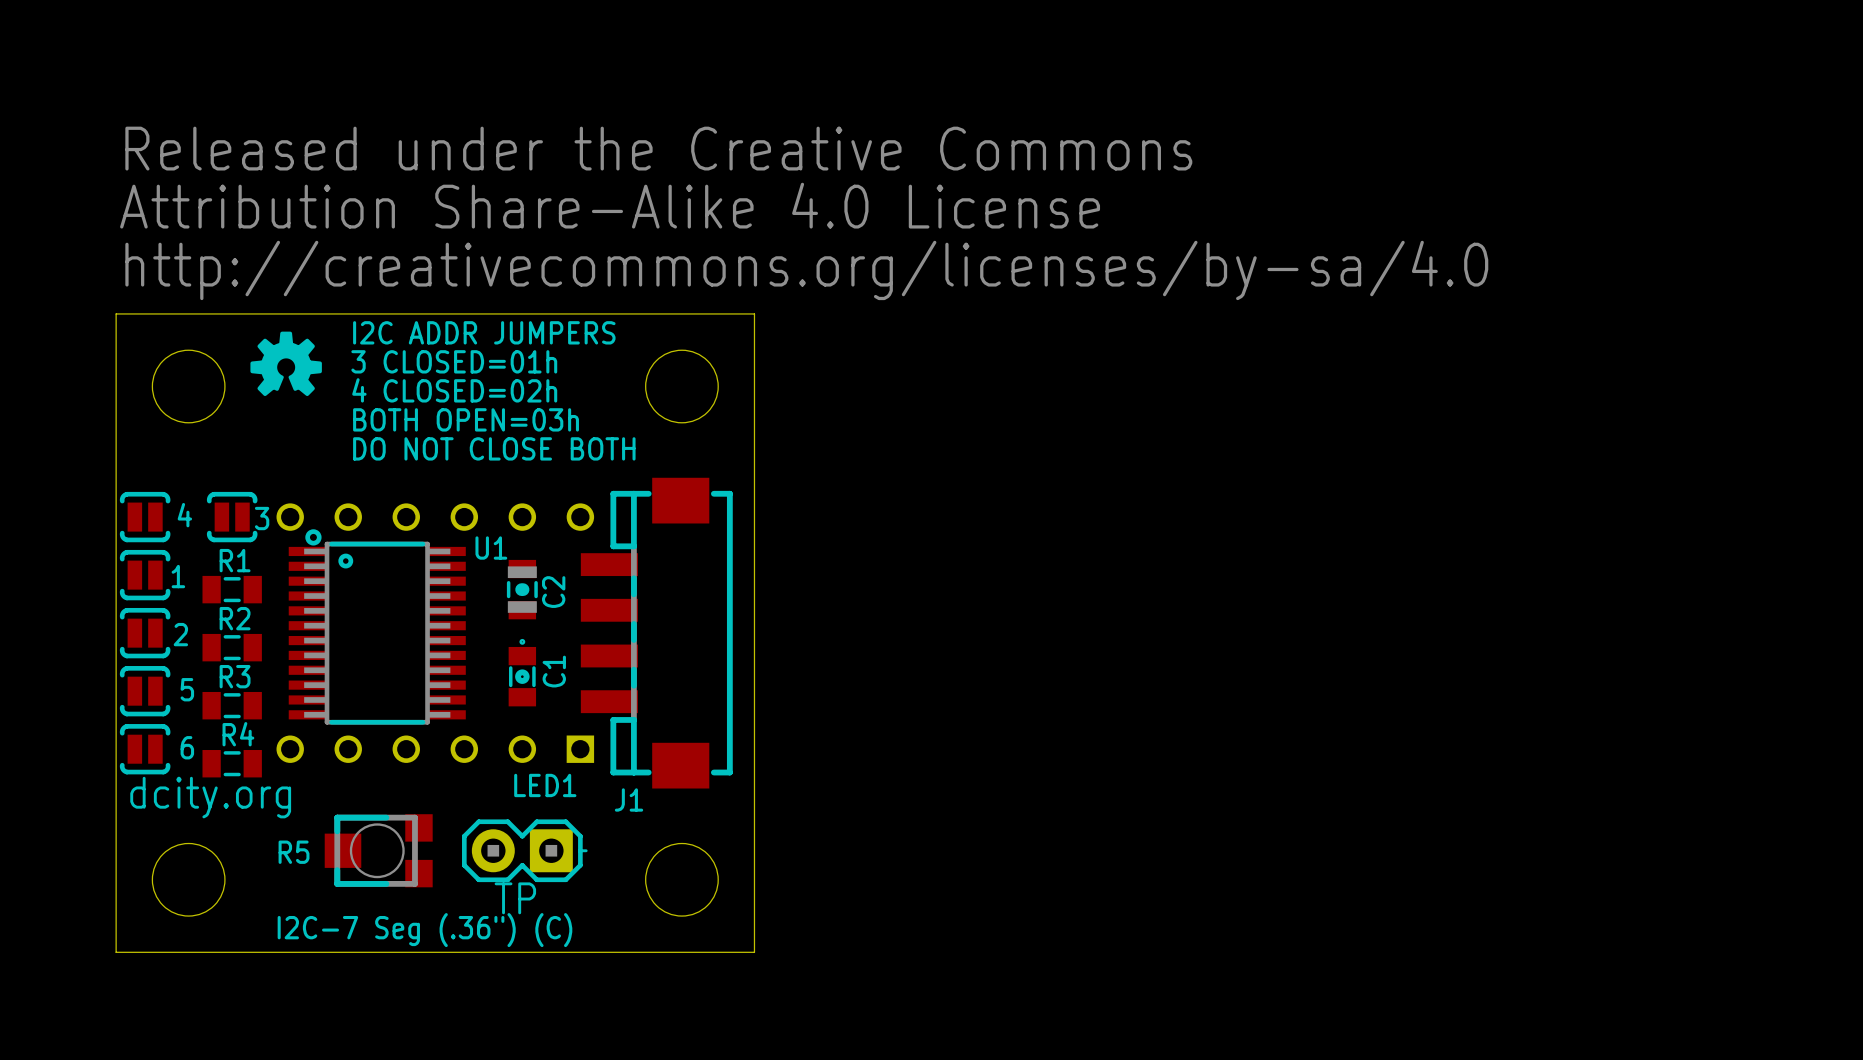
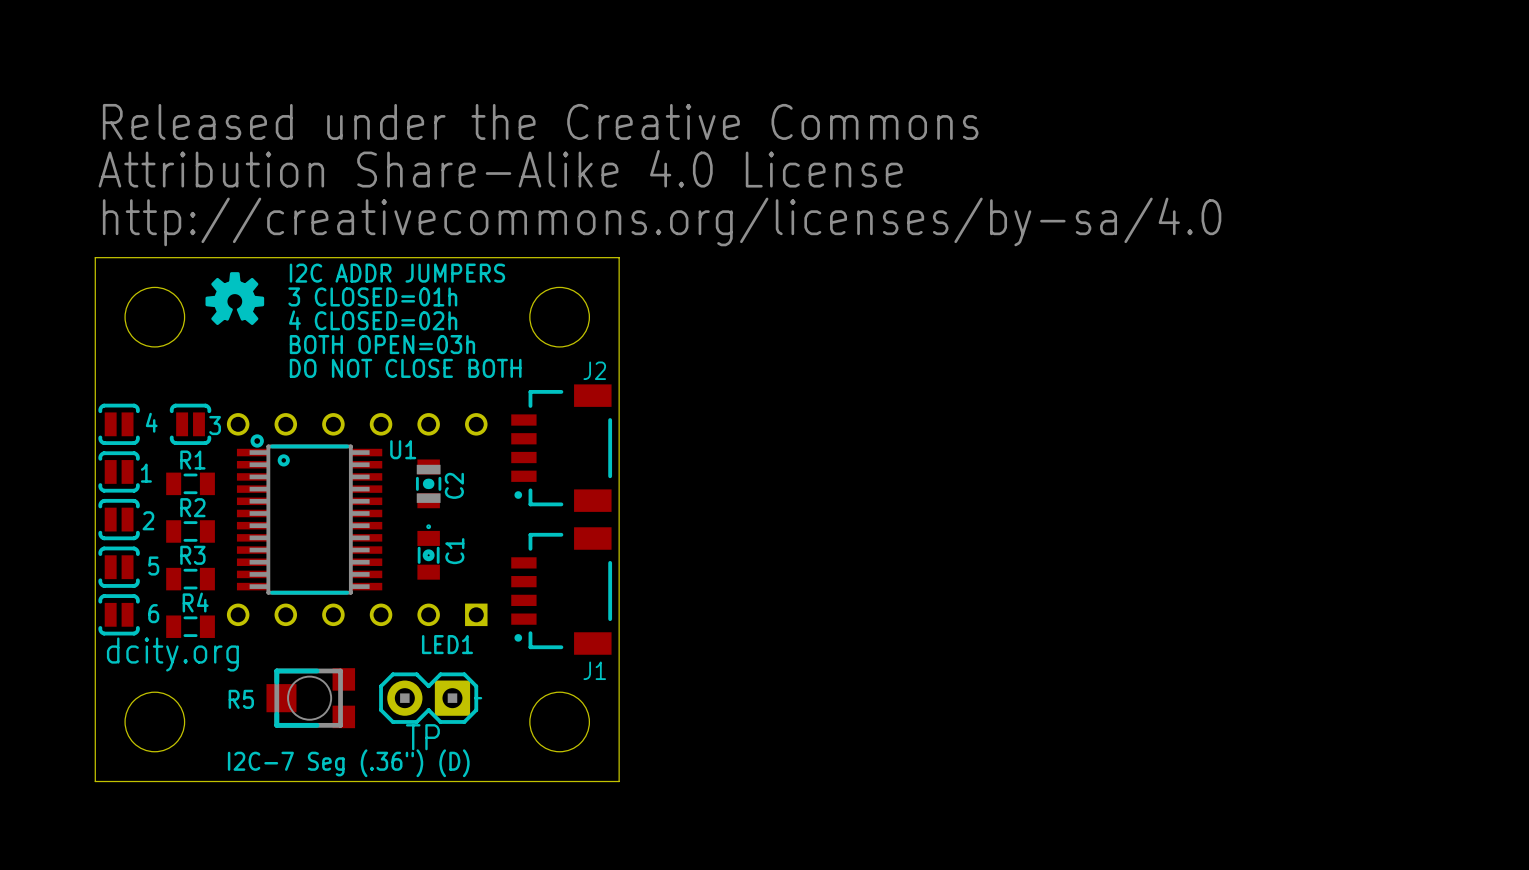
J1 footprint: [580, 477, 733, 789] -> [511, 527, 613, 655]
J2: none -> (561, 448)
J1 name position: J1 (629, 799) -> J1 (594, 670)
text: I2C-7 Seg (.36") (C) (424, 930) -> I2C-7 Seg (.36") (D) (348, 763)

